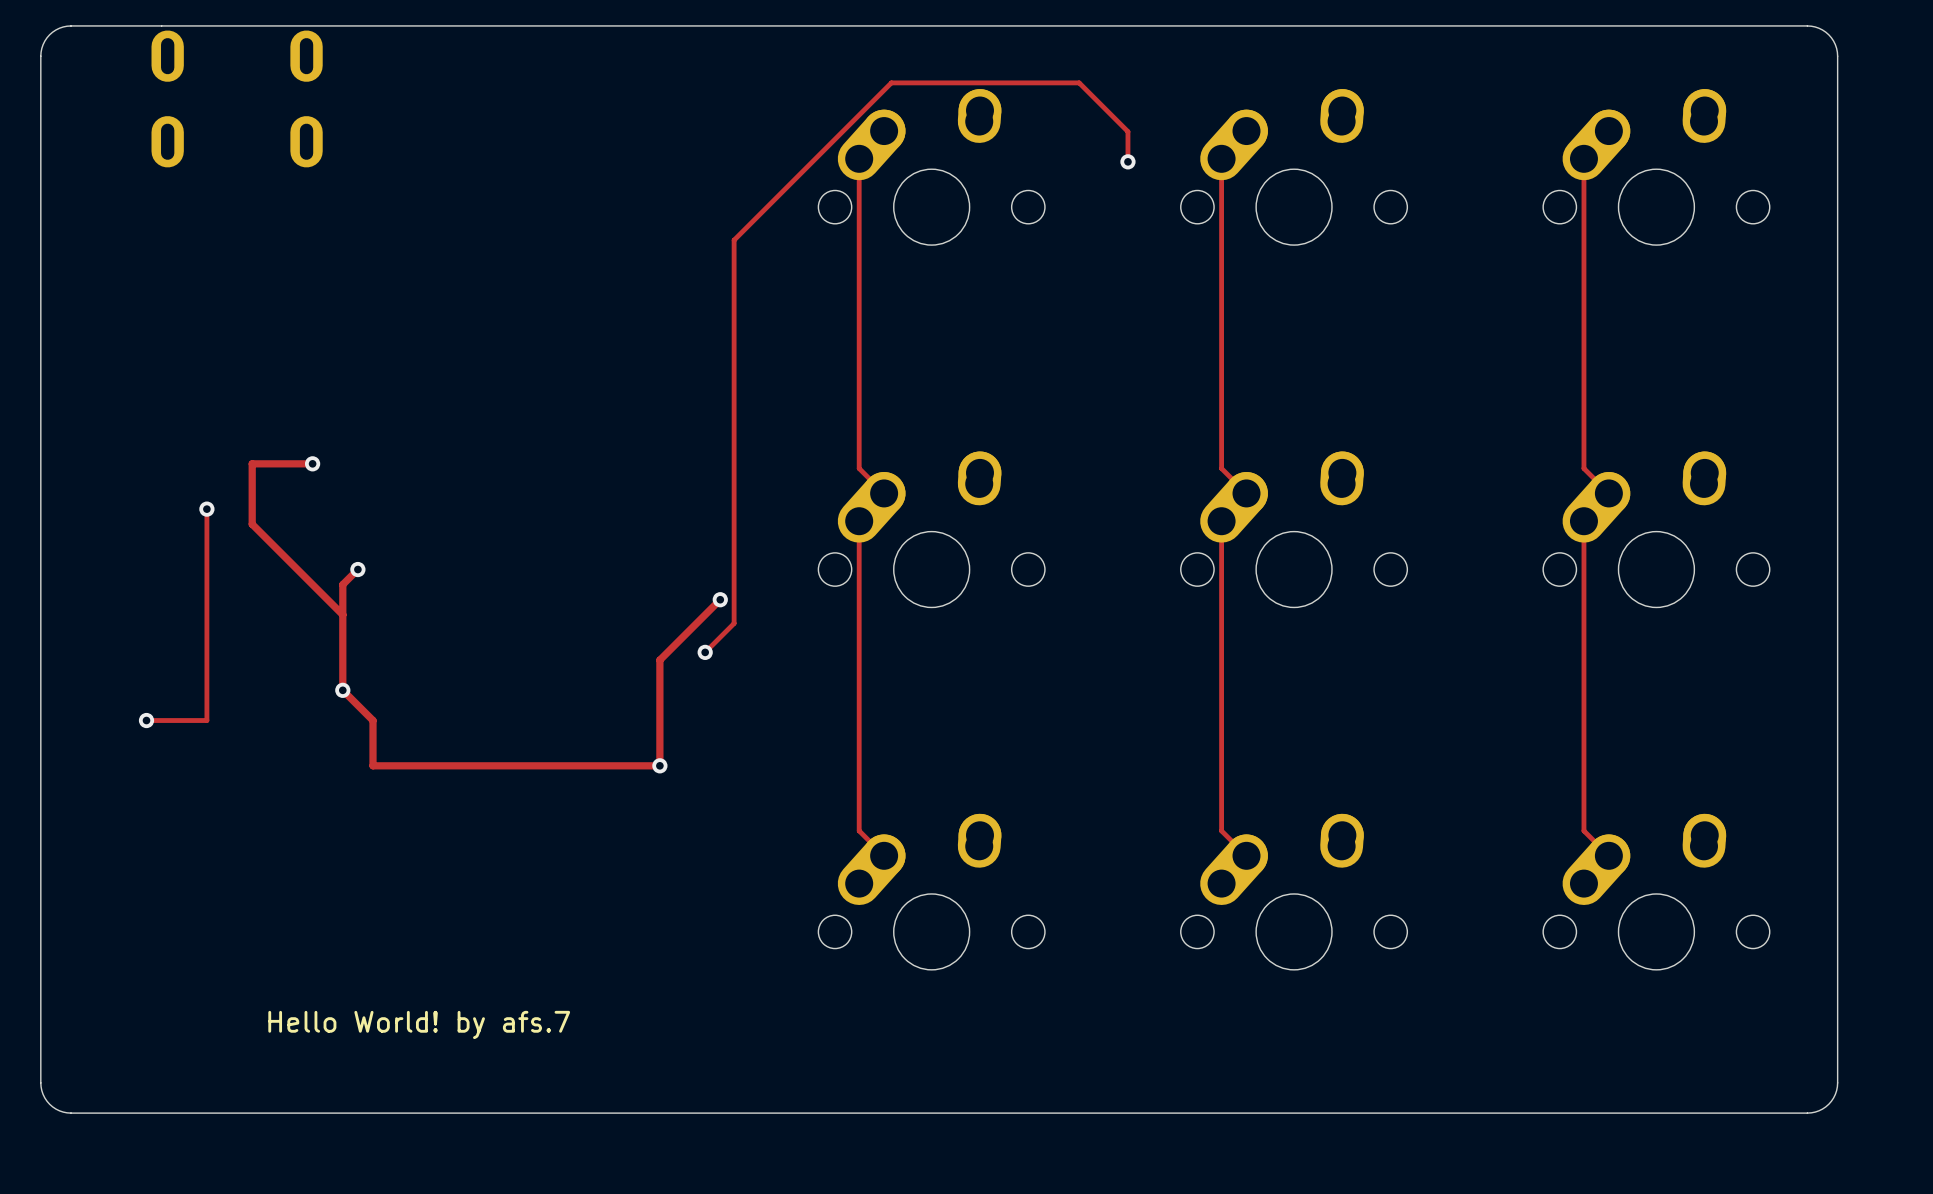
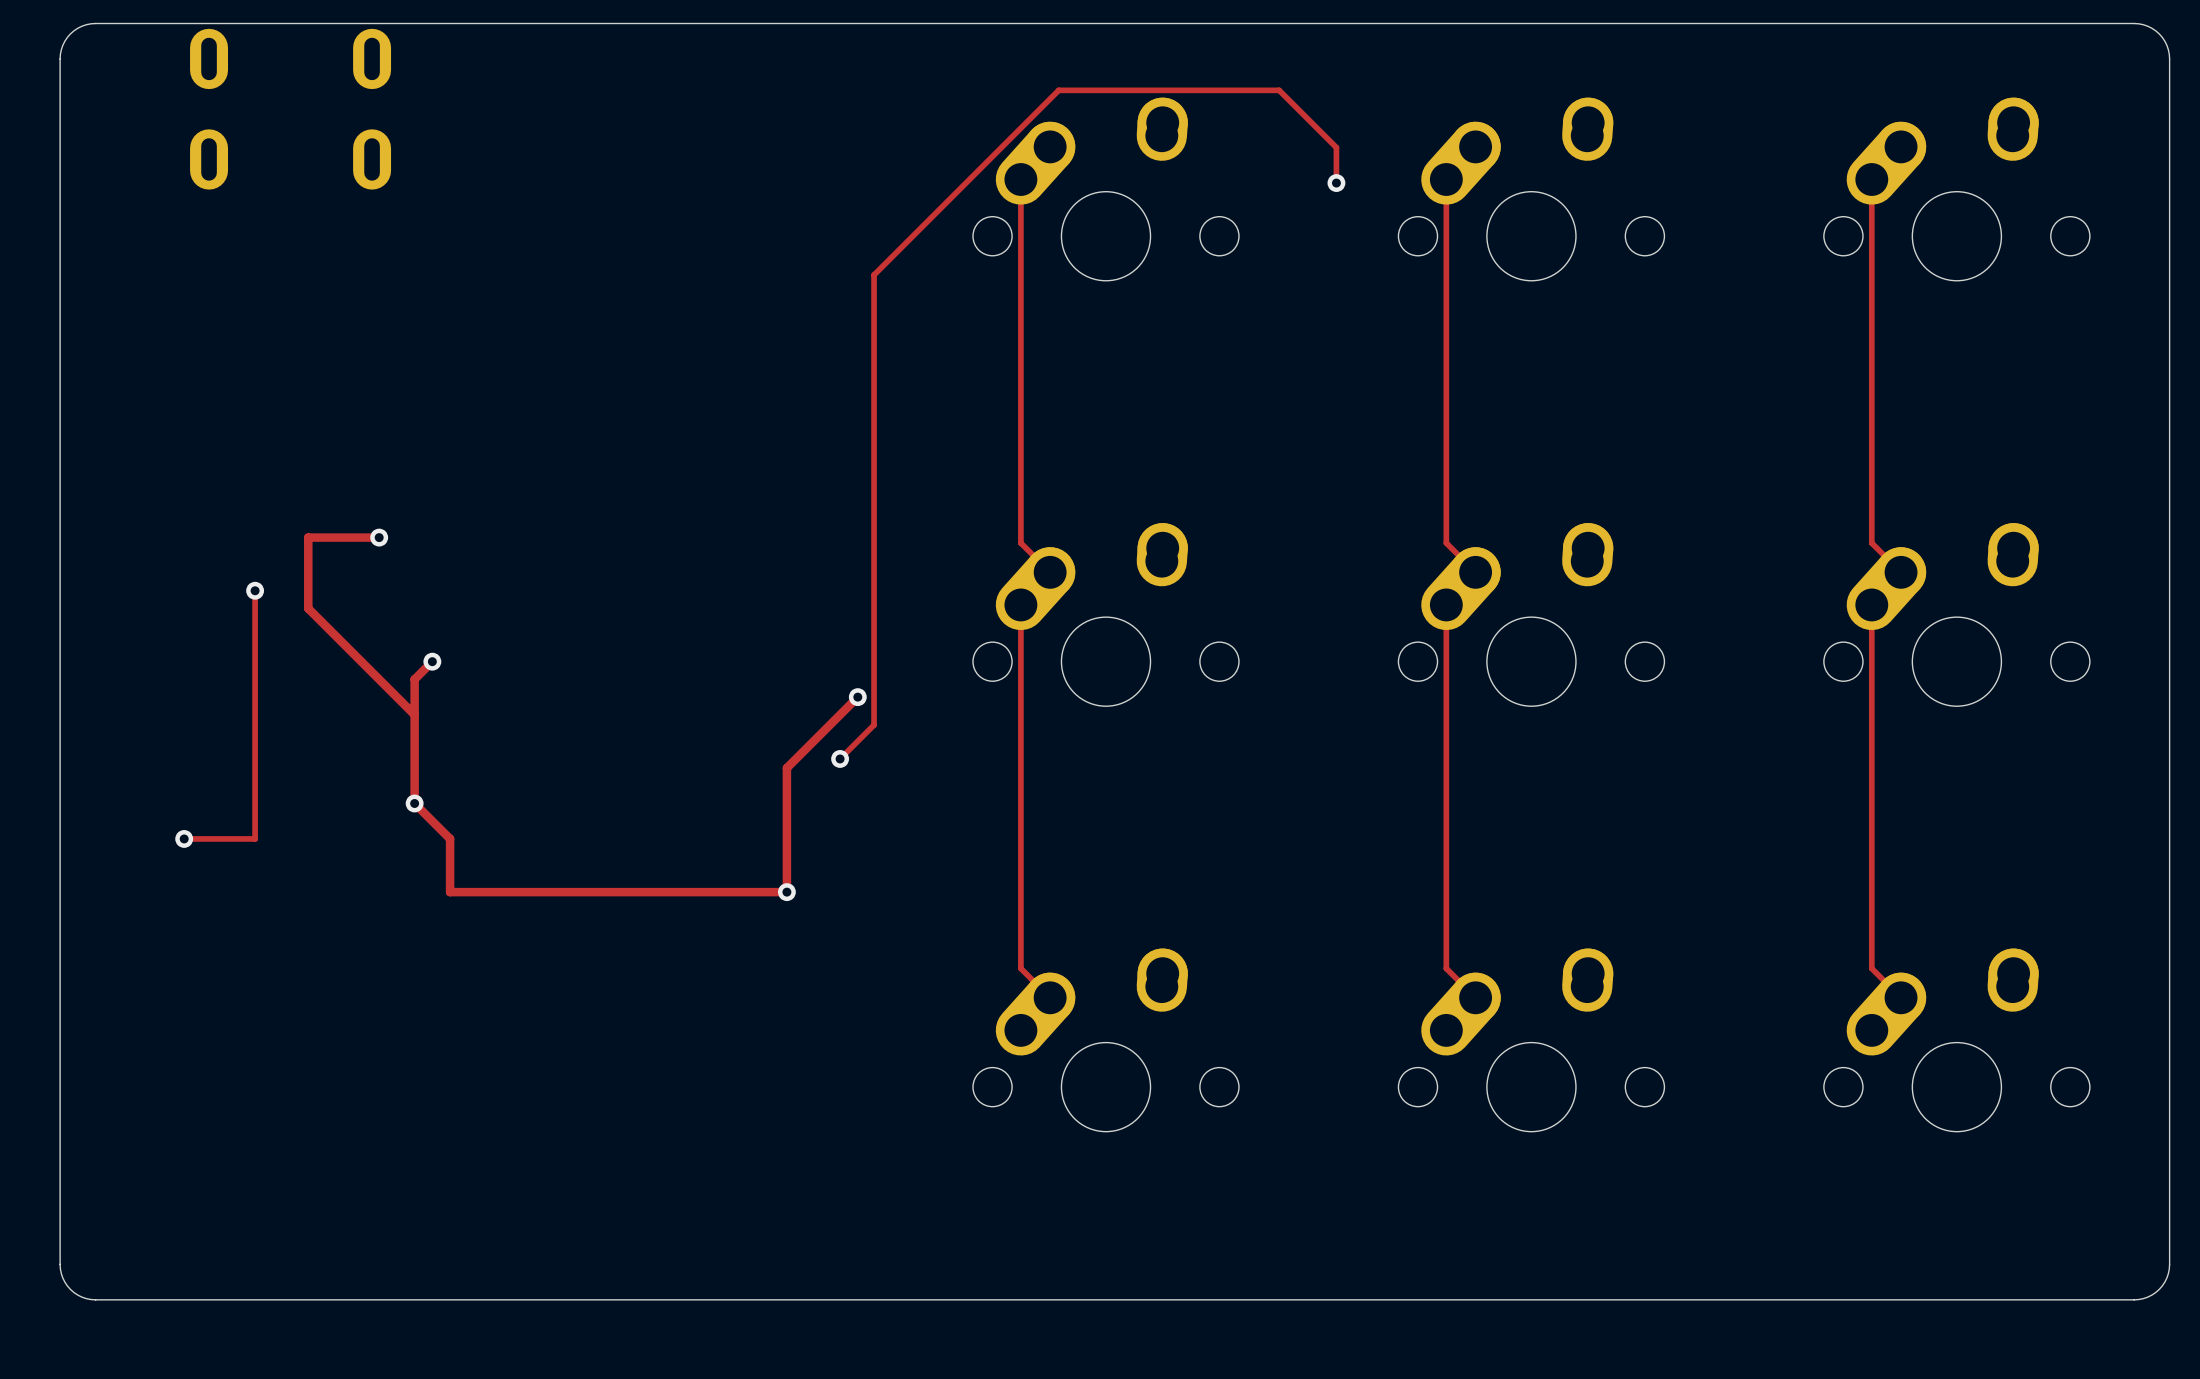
text: Hello World! by afs.7 (419, 1024) -> none

